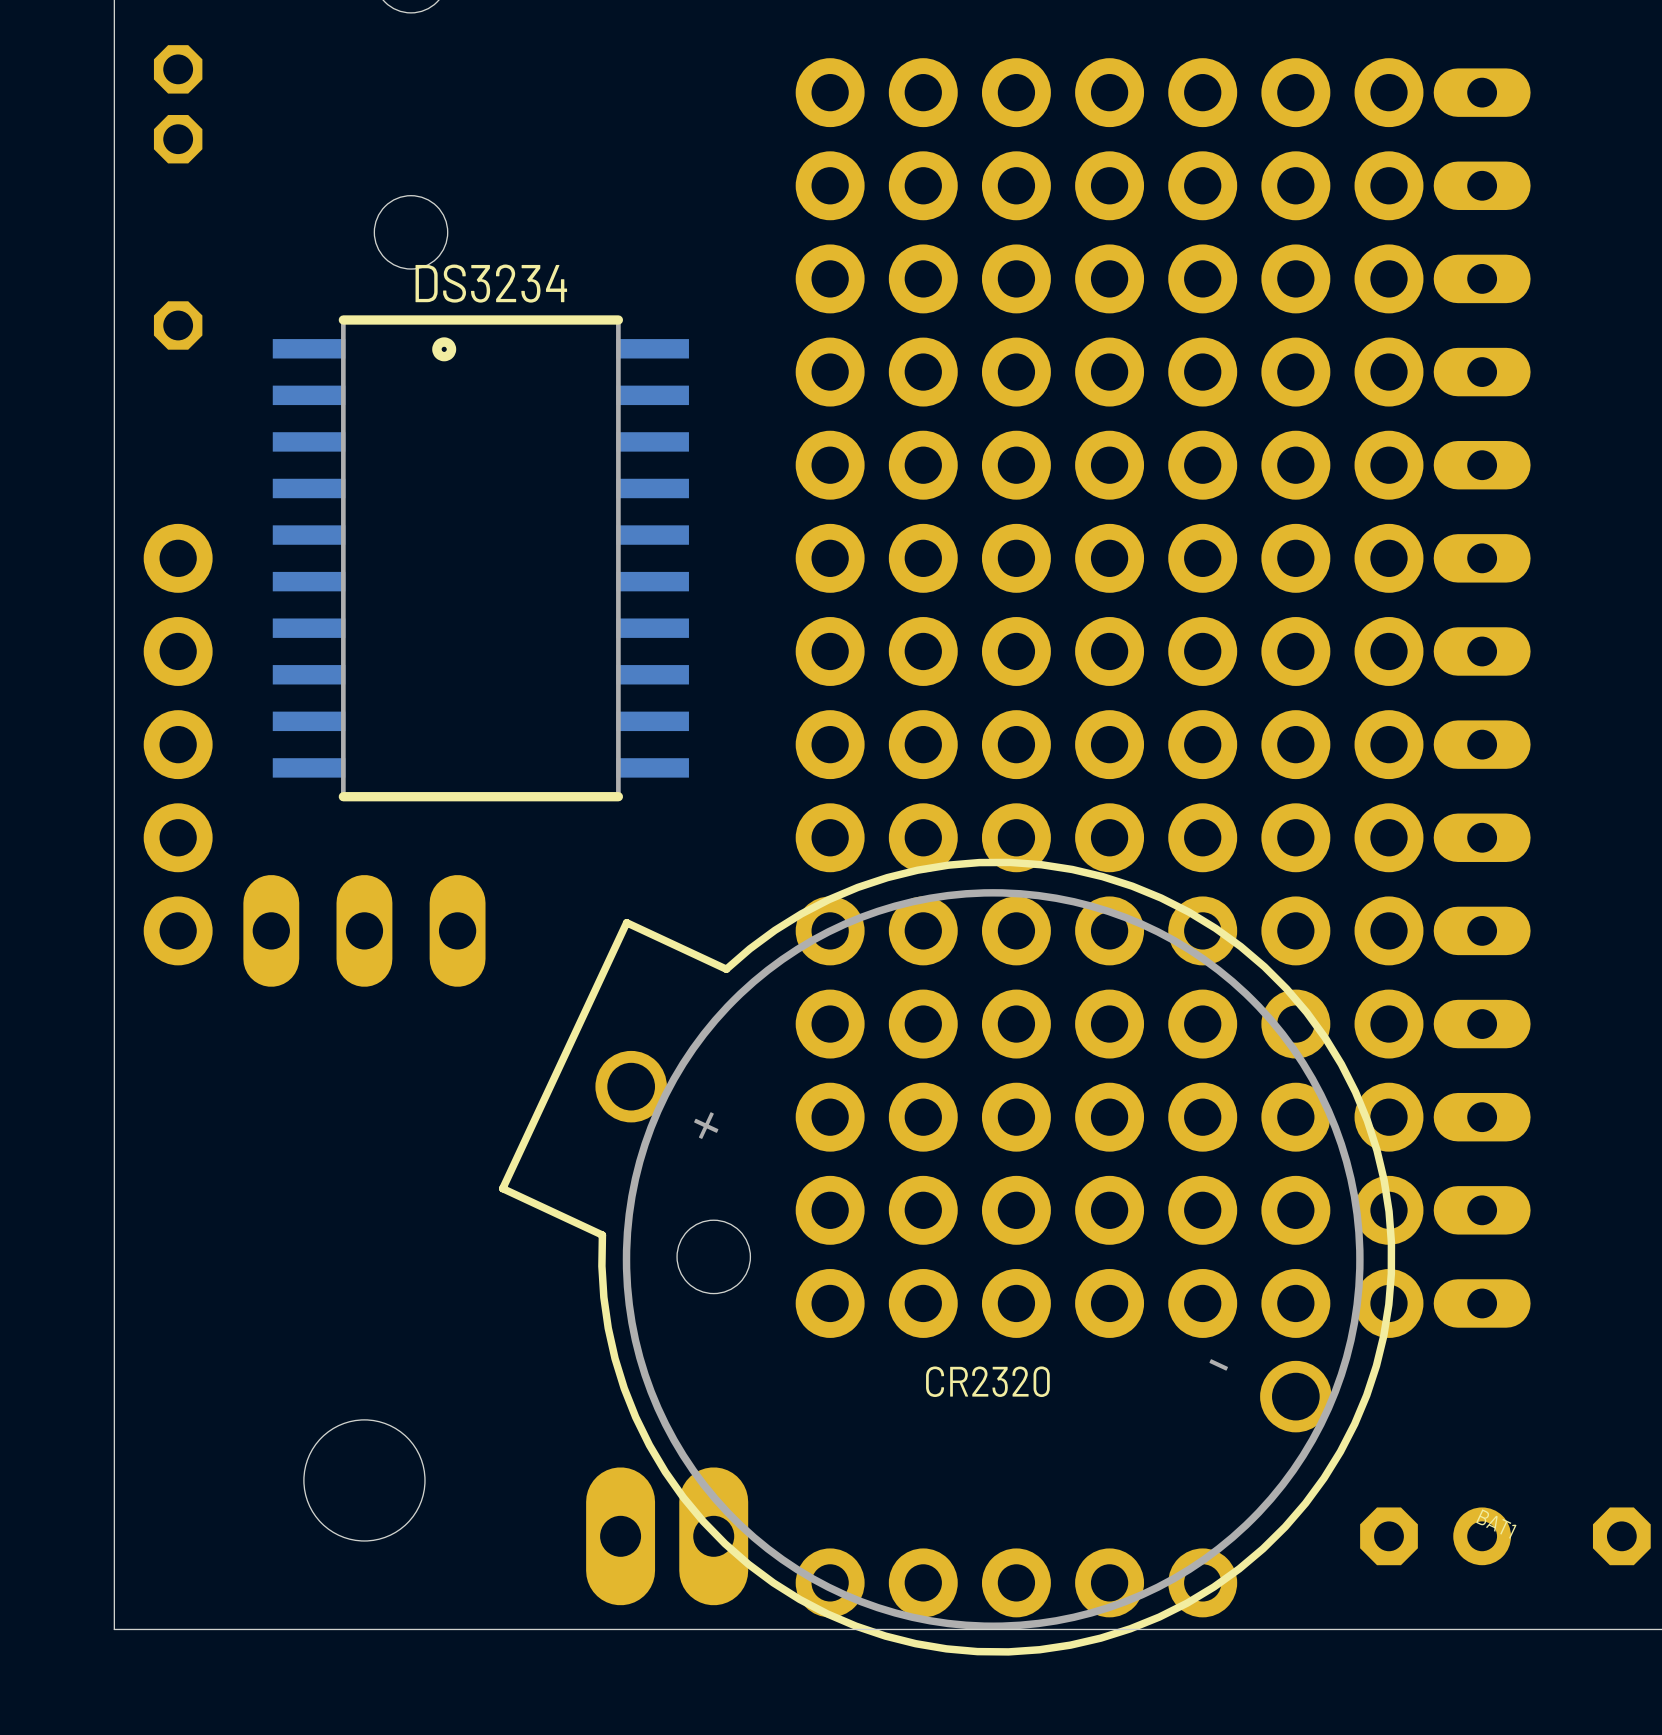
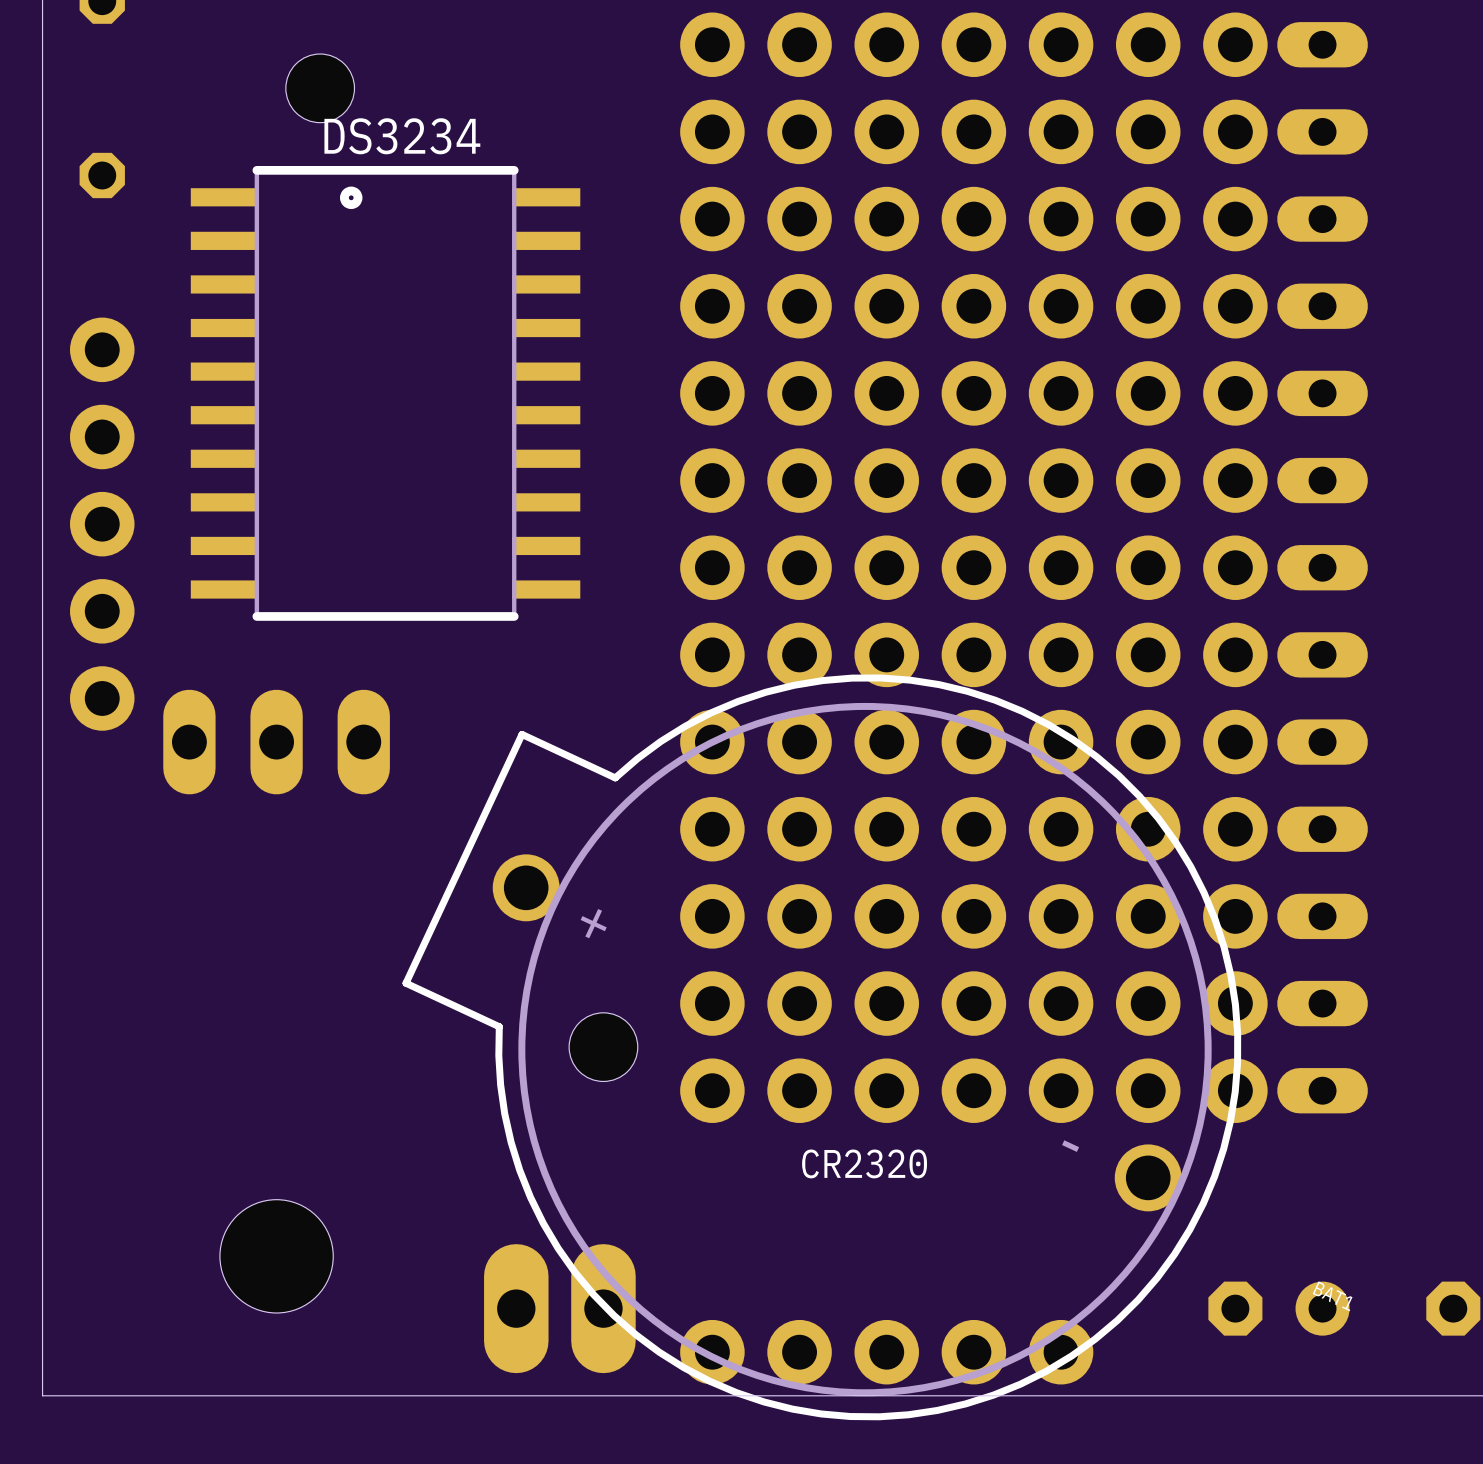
part position: (178, 744) -> (102, 524)

